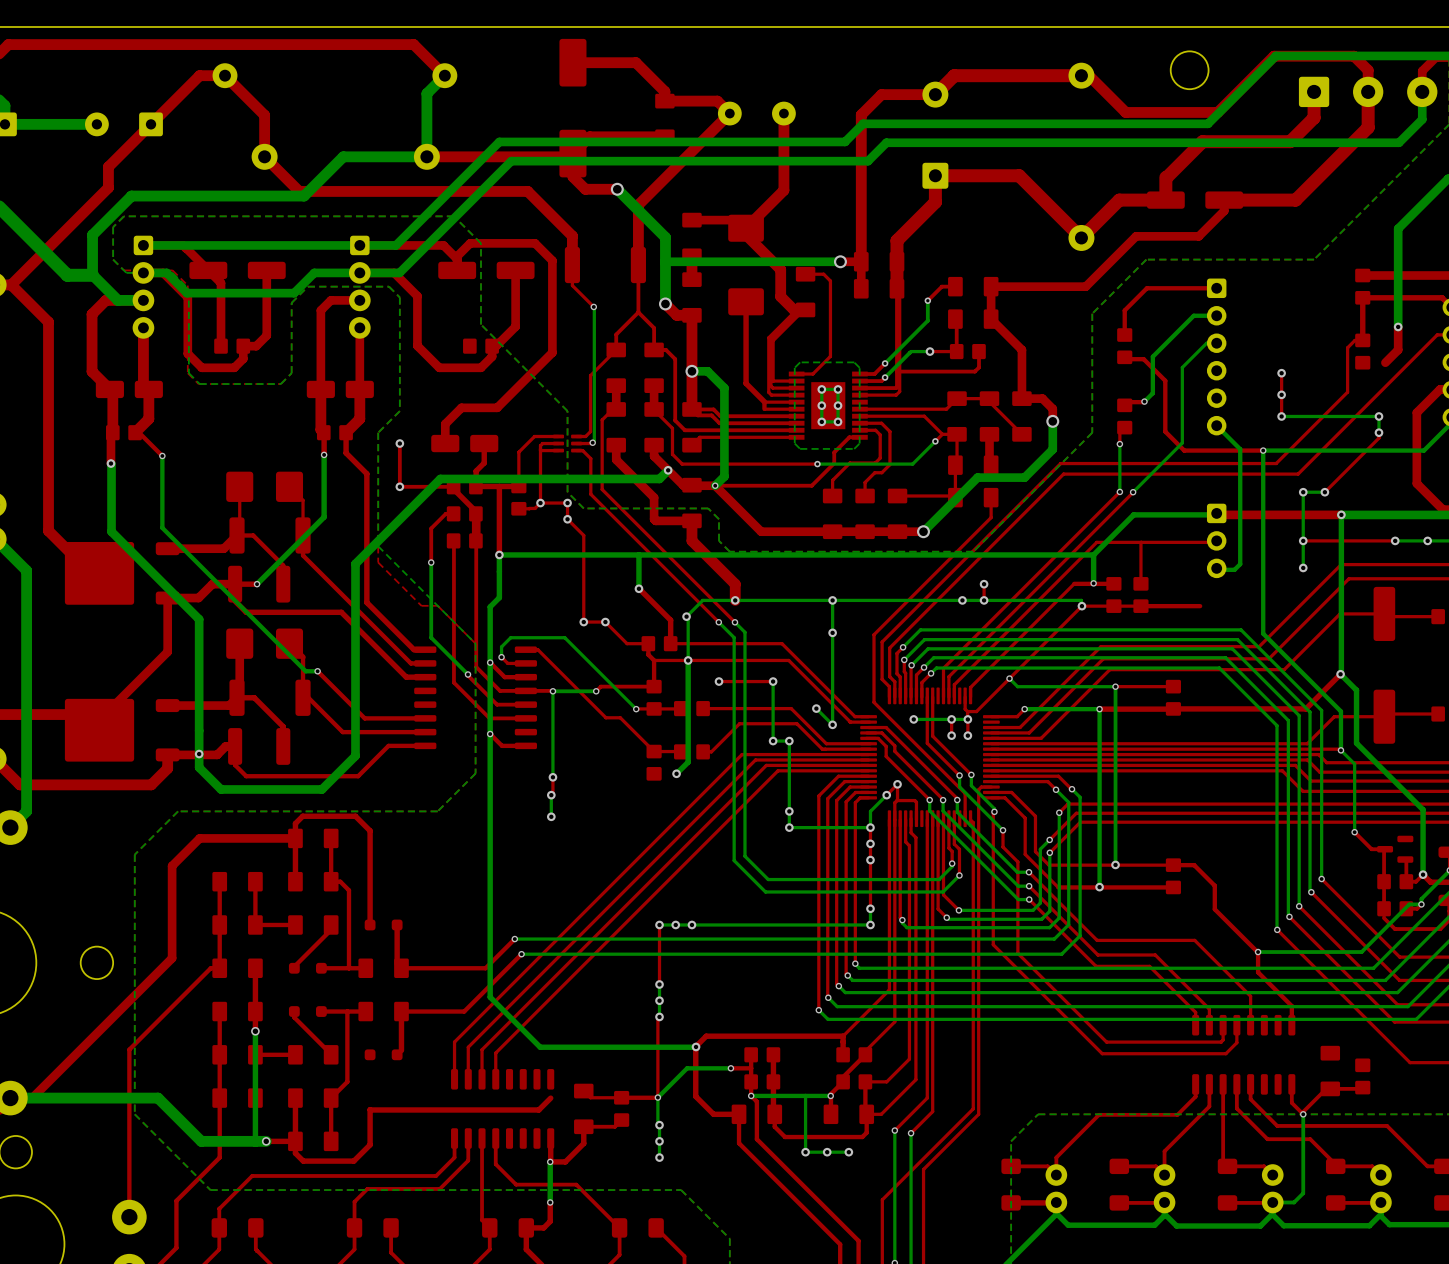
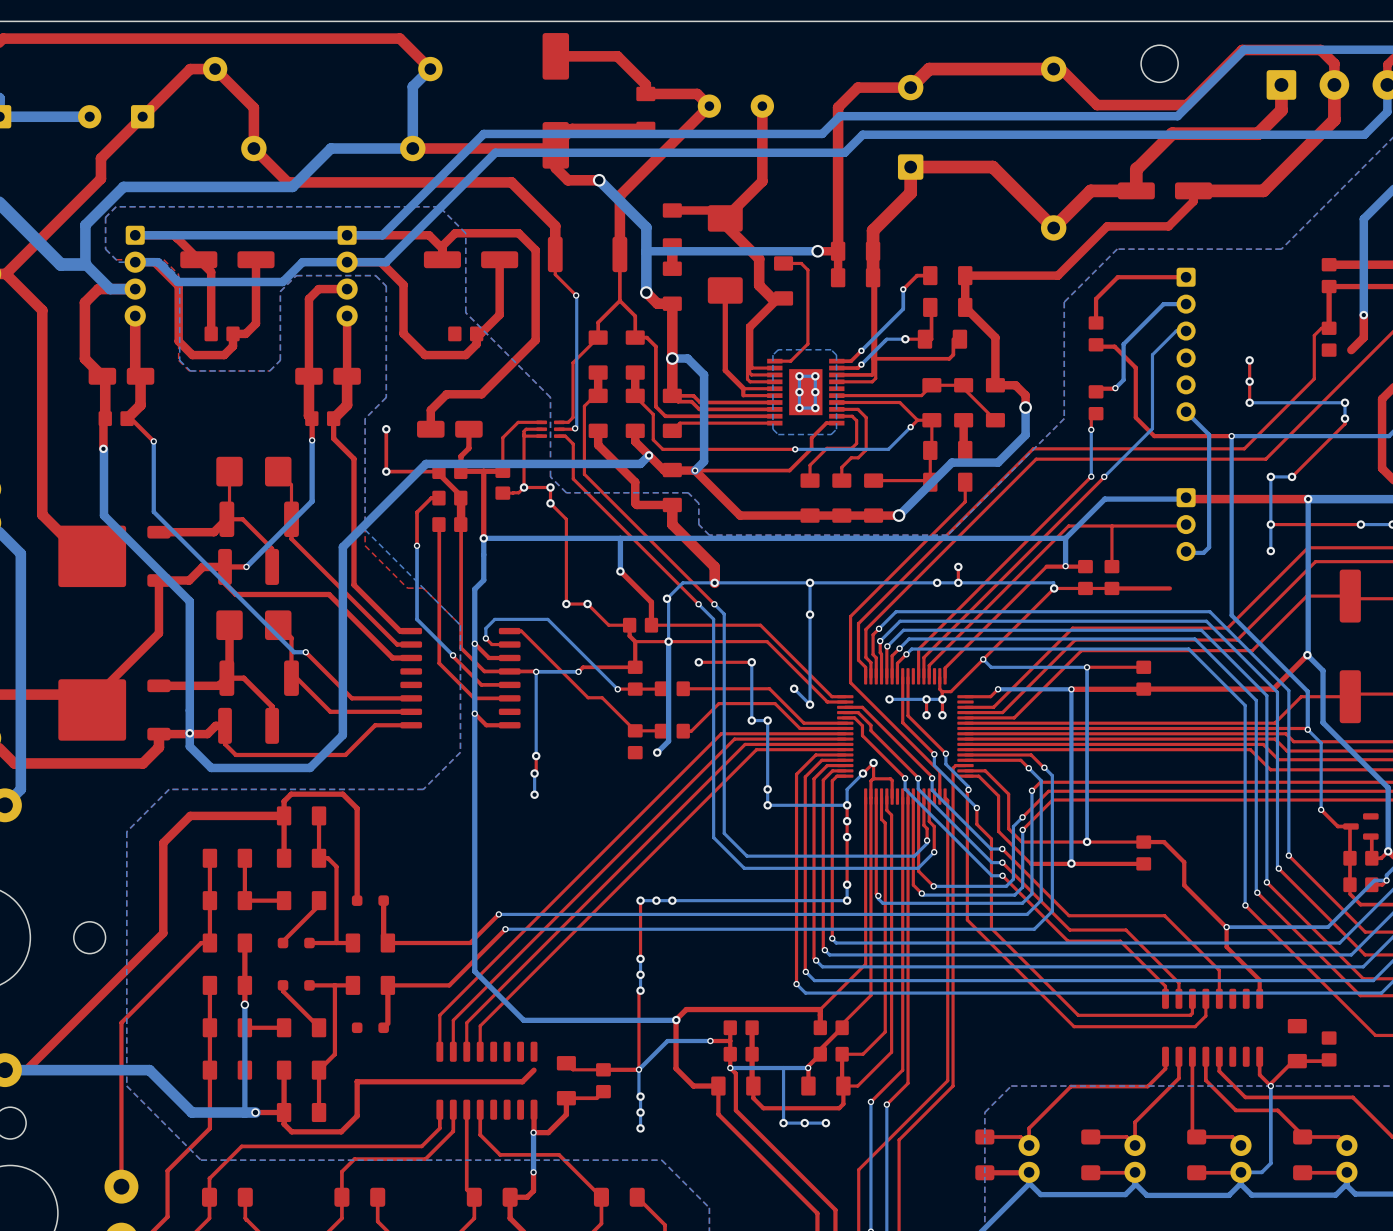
part footprint: [949, 343, 986, 360] -> [917, 329, 968, 349]

